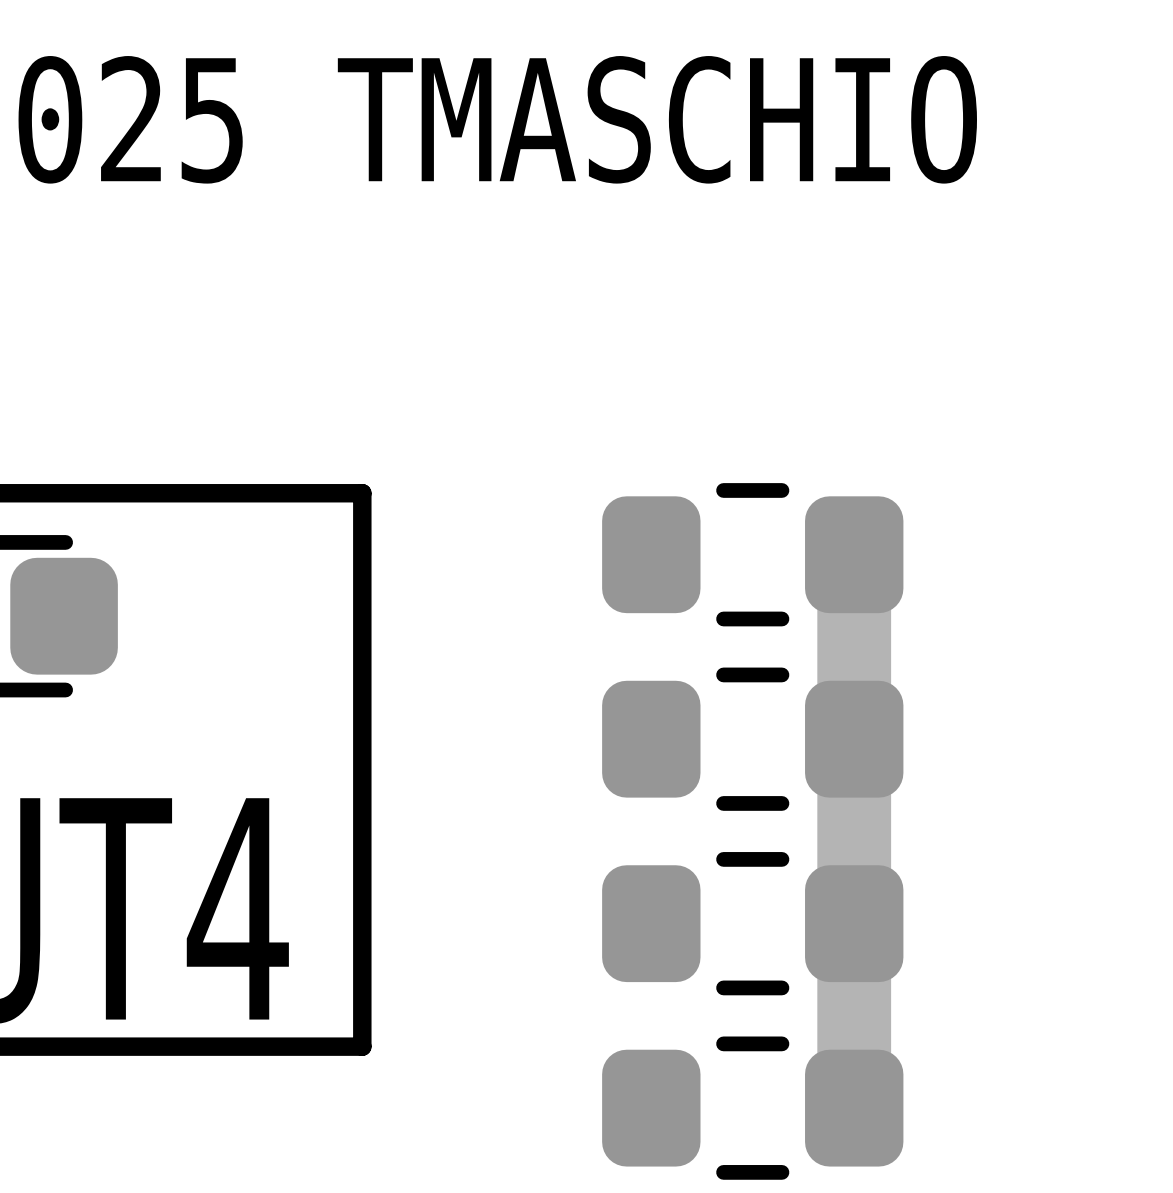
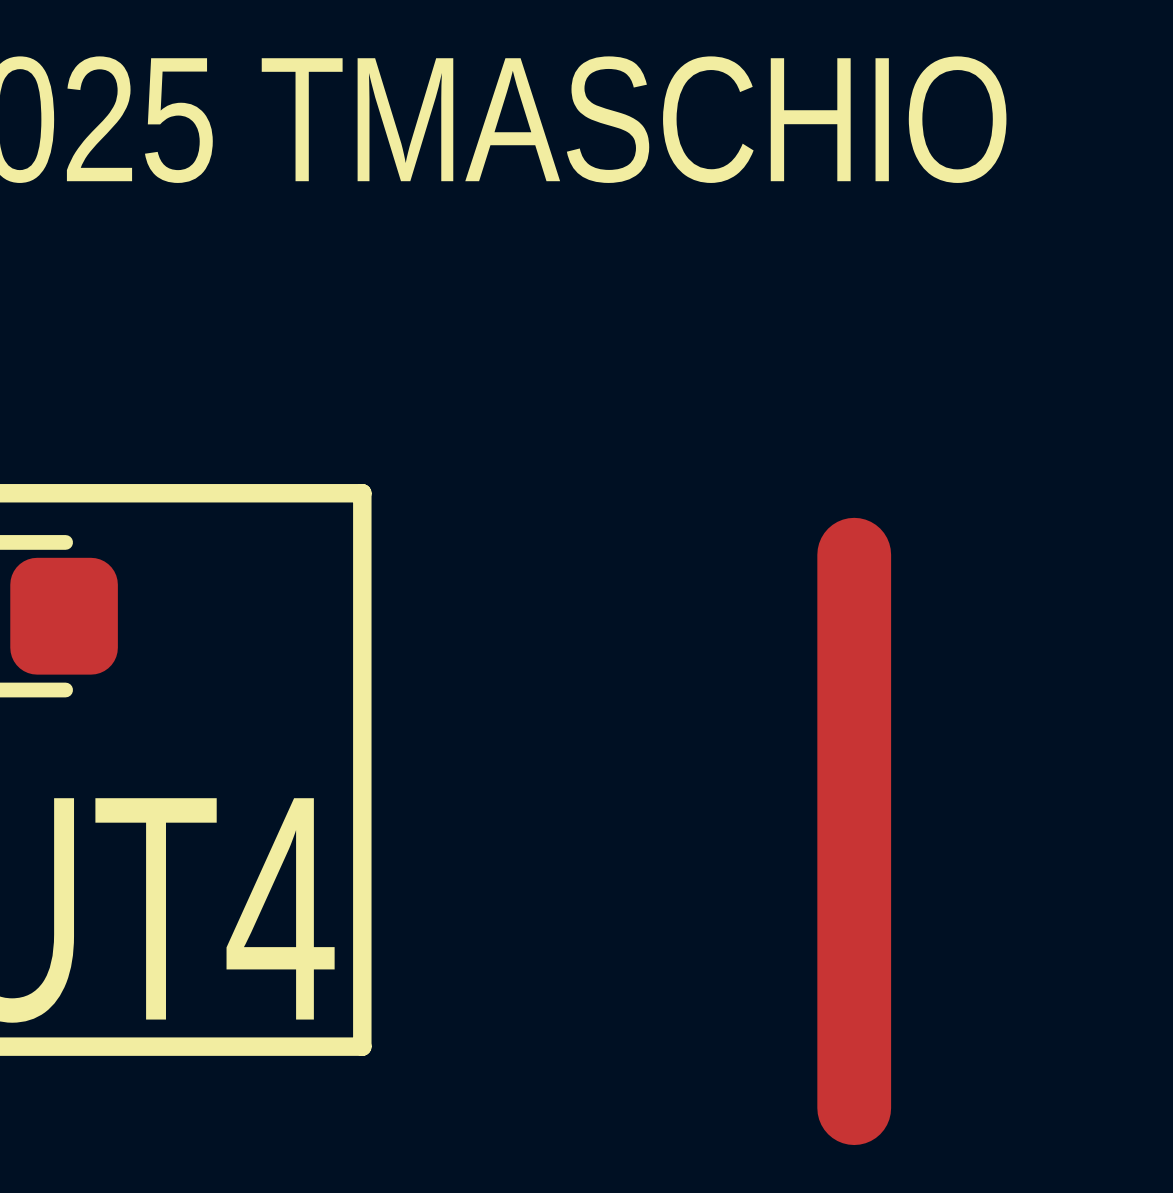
part: (752, 554) -> none
part: (752, 739) -> none
part: (752, 923) -> none
part: (752, 1108) -> none

